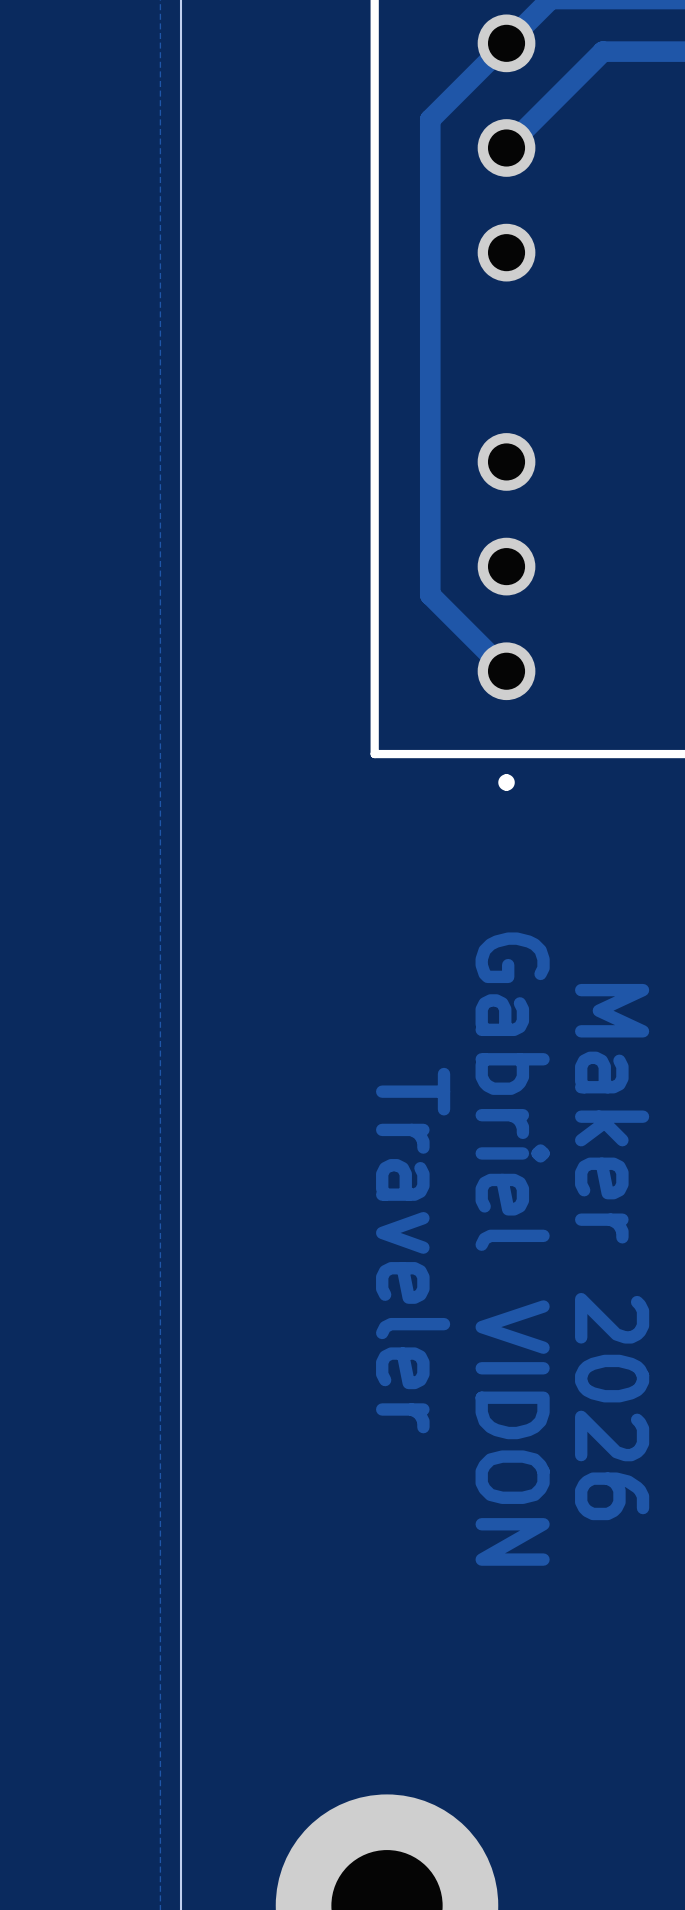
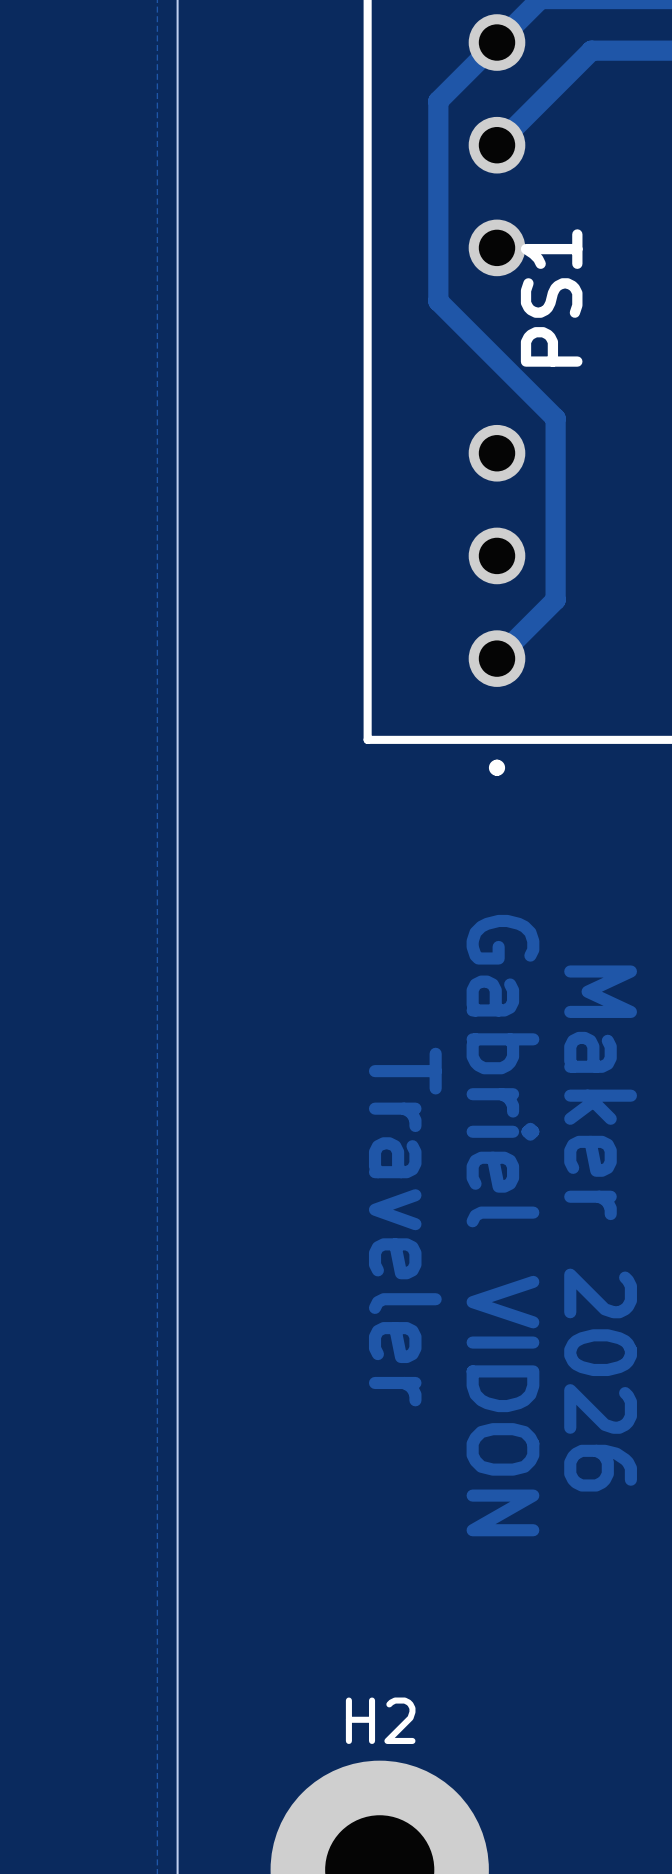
track: (446, 103) (430, 119) (430, 594) (506, 671) -> (438, 101) (438, 301) (555, 418) (555, 600) (497, 658)
PS1 name: none -> PS1 (551, 298)
H2 name: none -> H2 (380, 1720)

